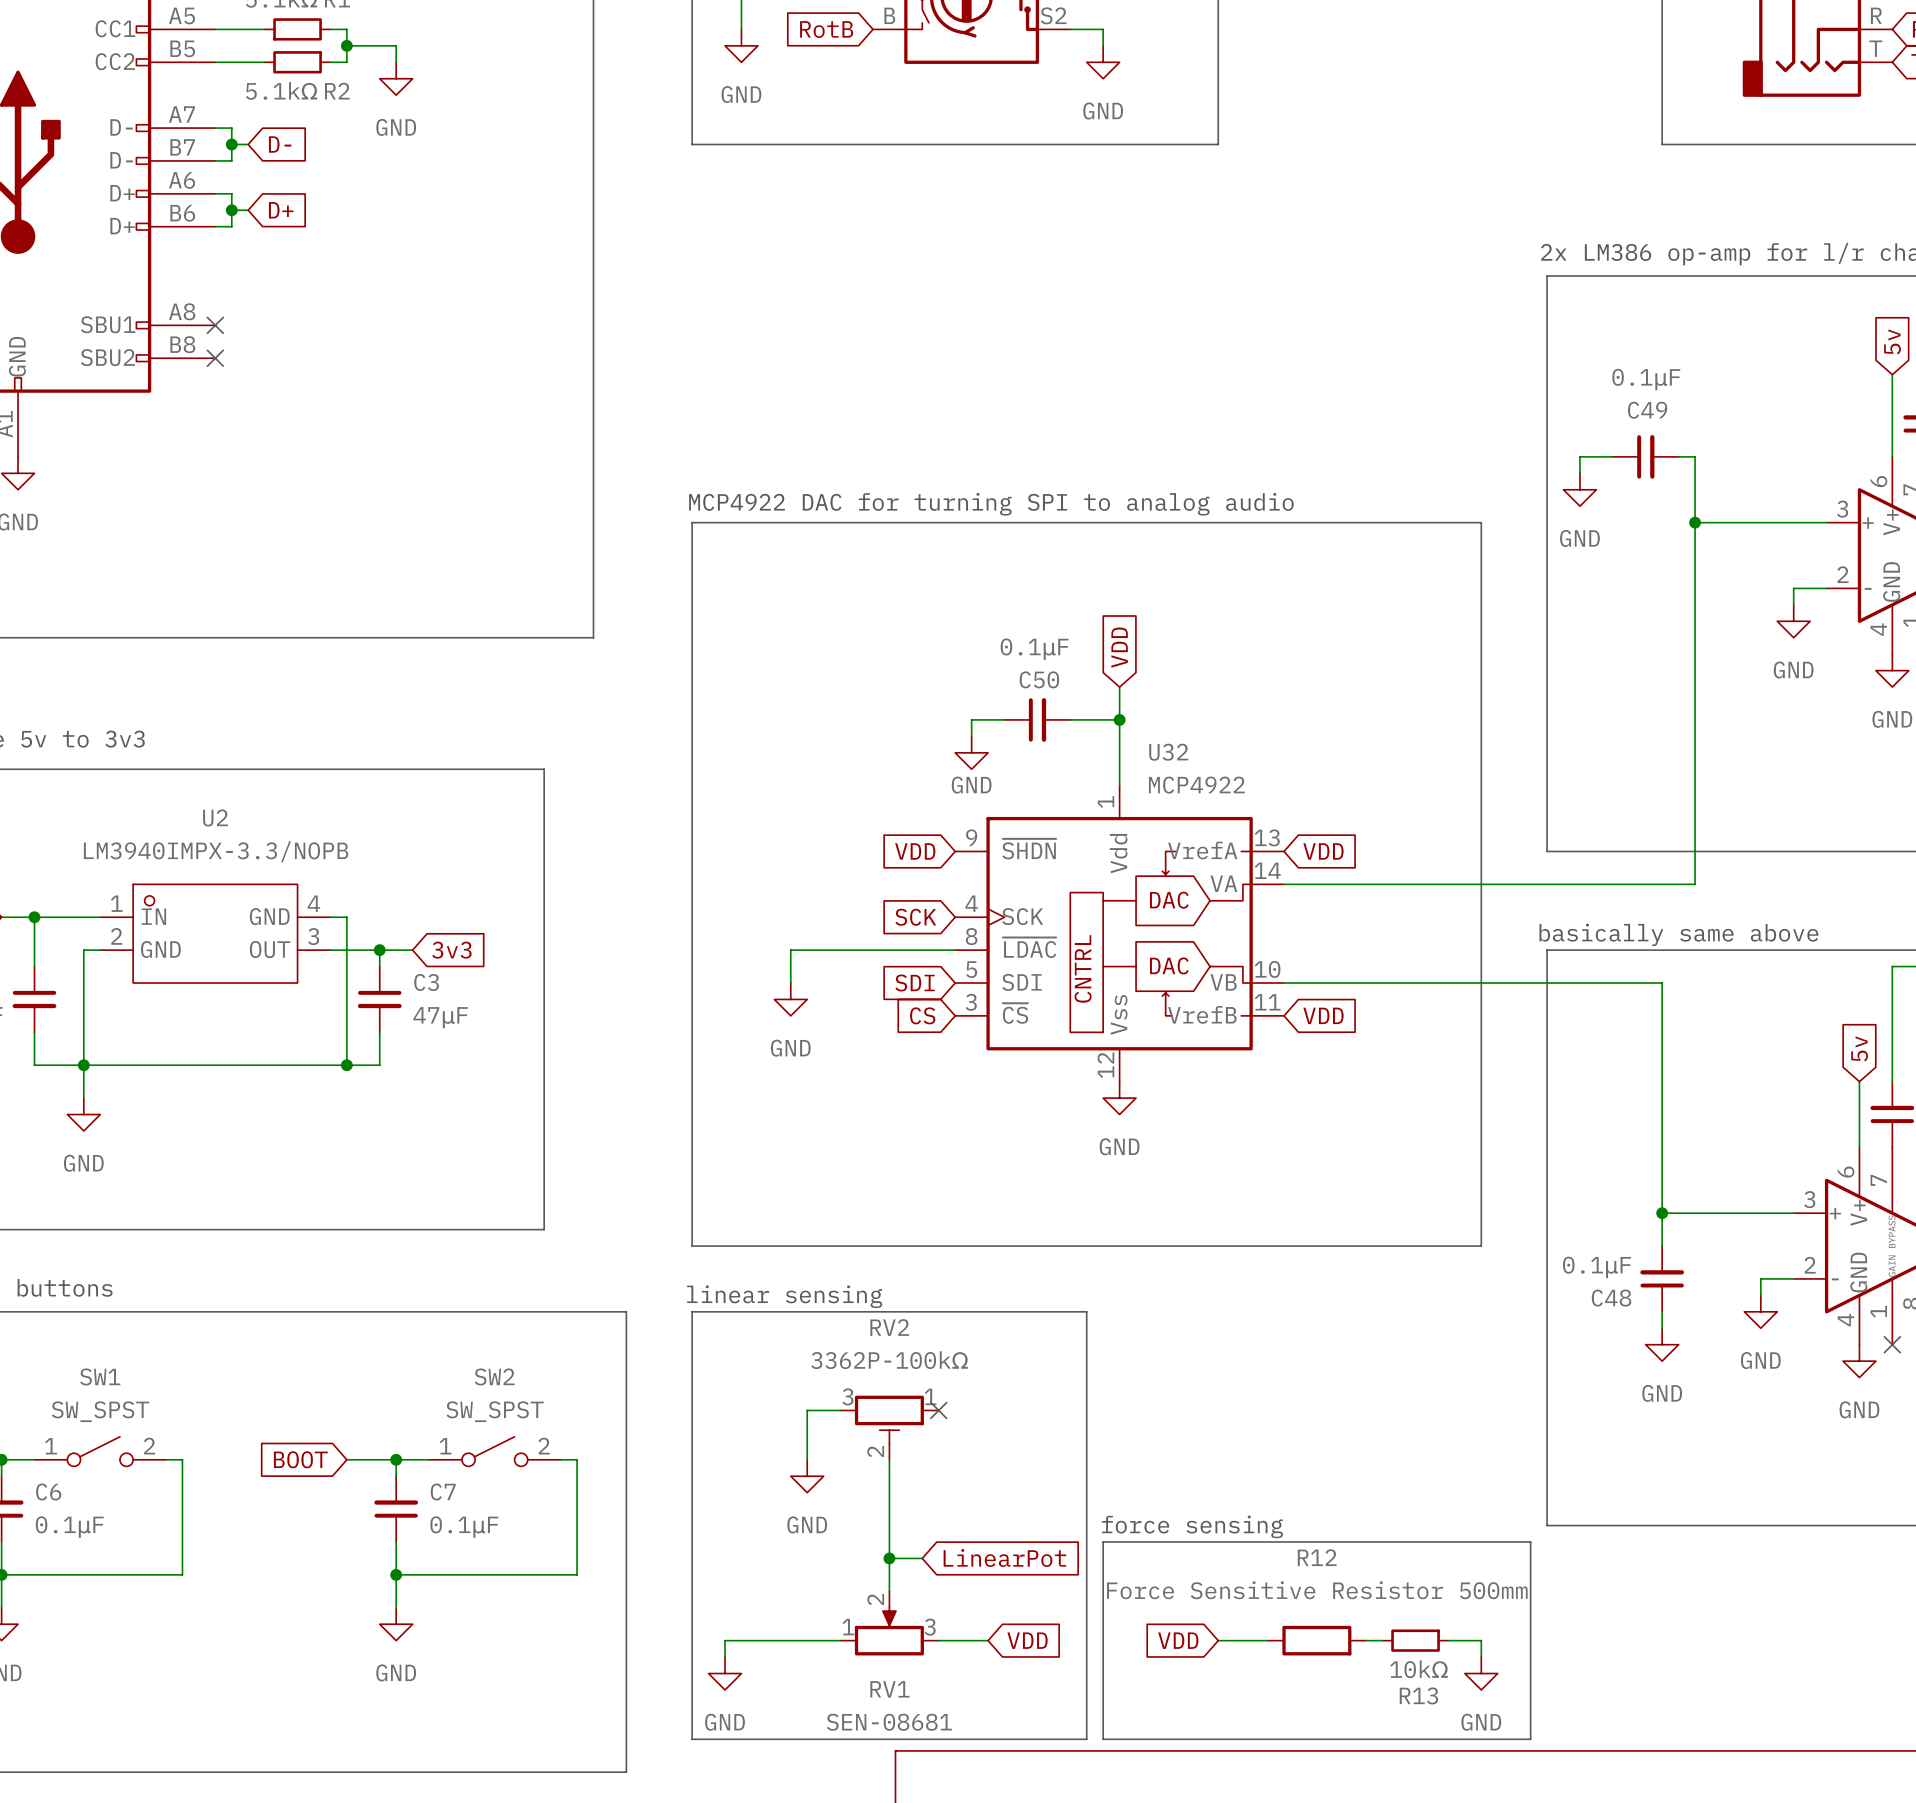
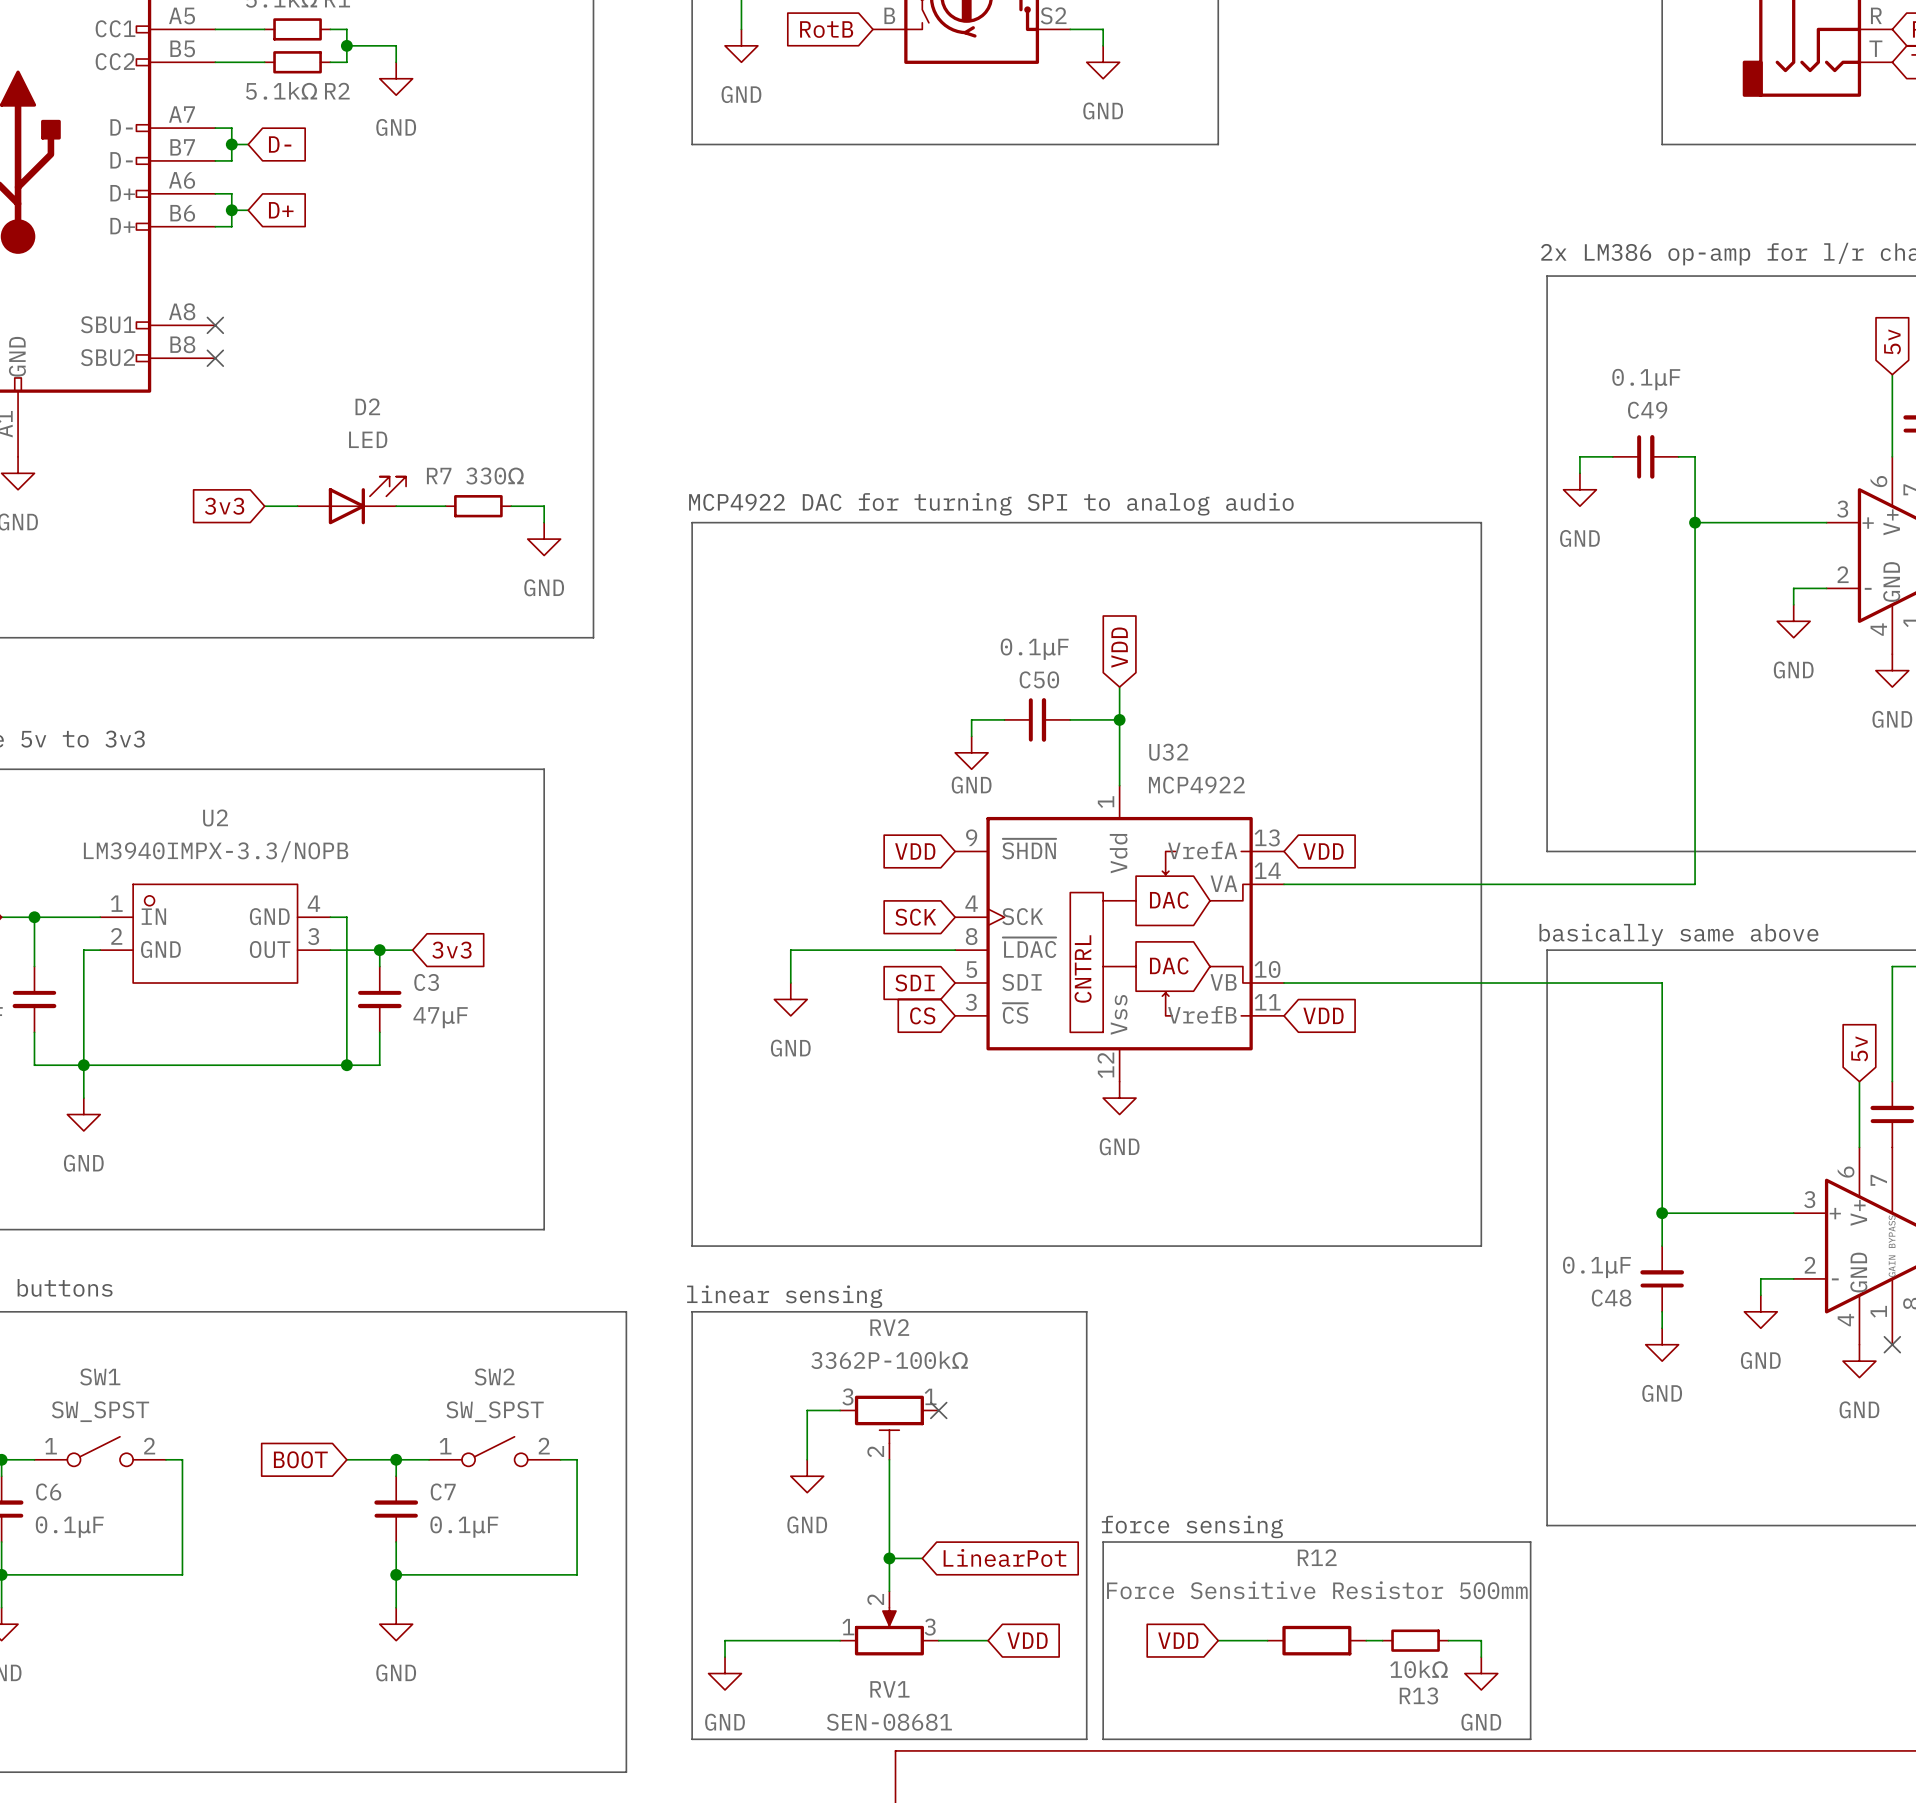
D2: none -> LED (351, 500)
global label: none -> 3v3 (224, 506)
wire: none -> (264, 506) (297, 506)
wire: none -> (396, 506) (445, 506)
R7: none -> 330Ω (478, 506)
wire: none -> (511, 506) (544, 506) (544, 522)
power symbol: none -> GND (544, 539)

